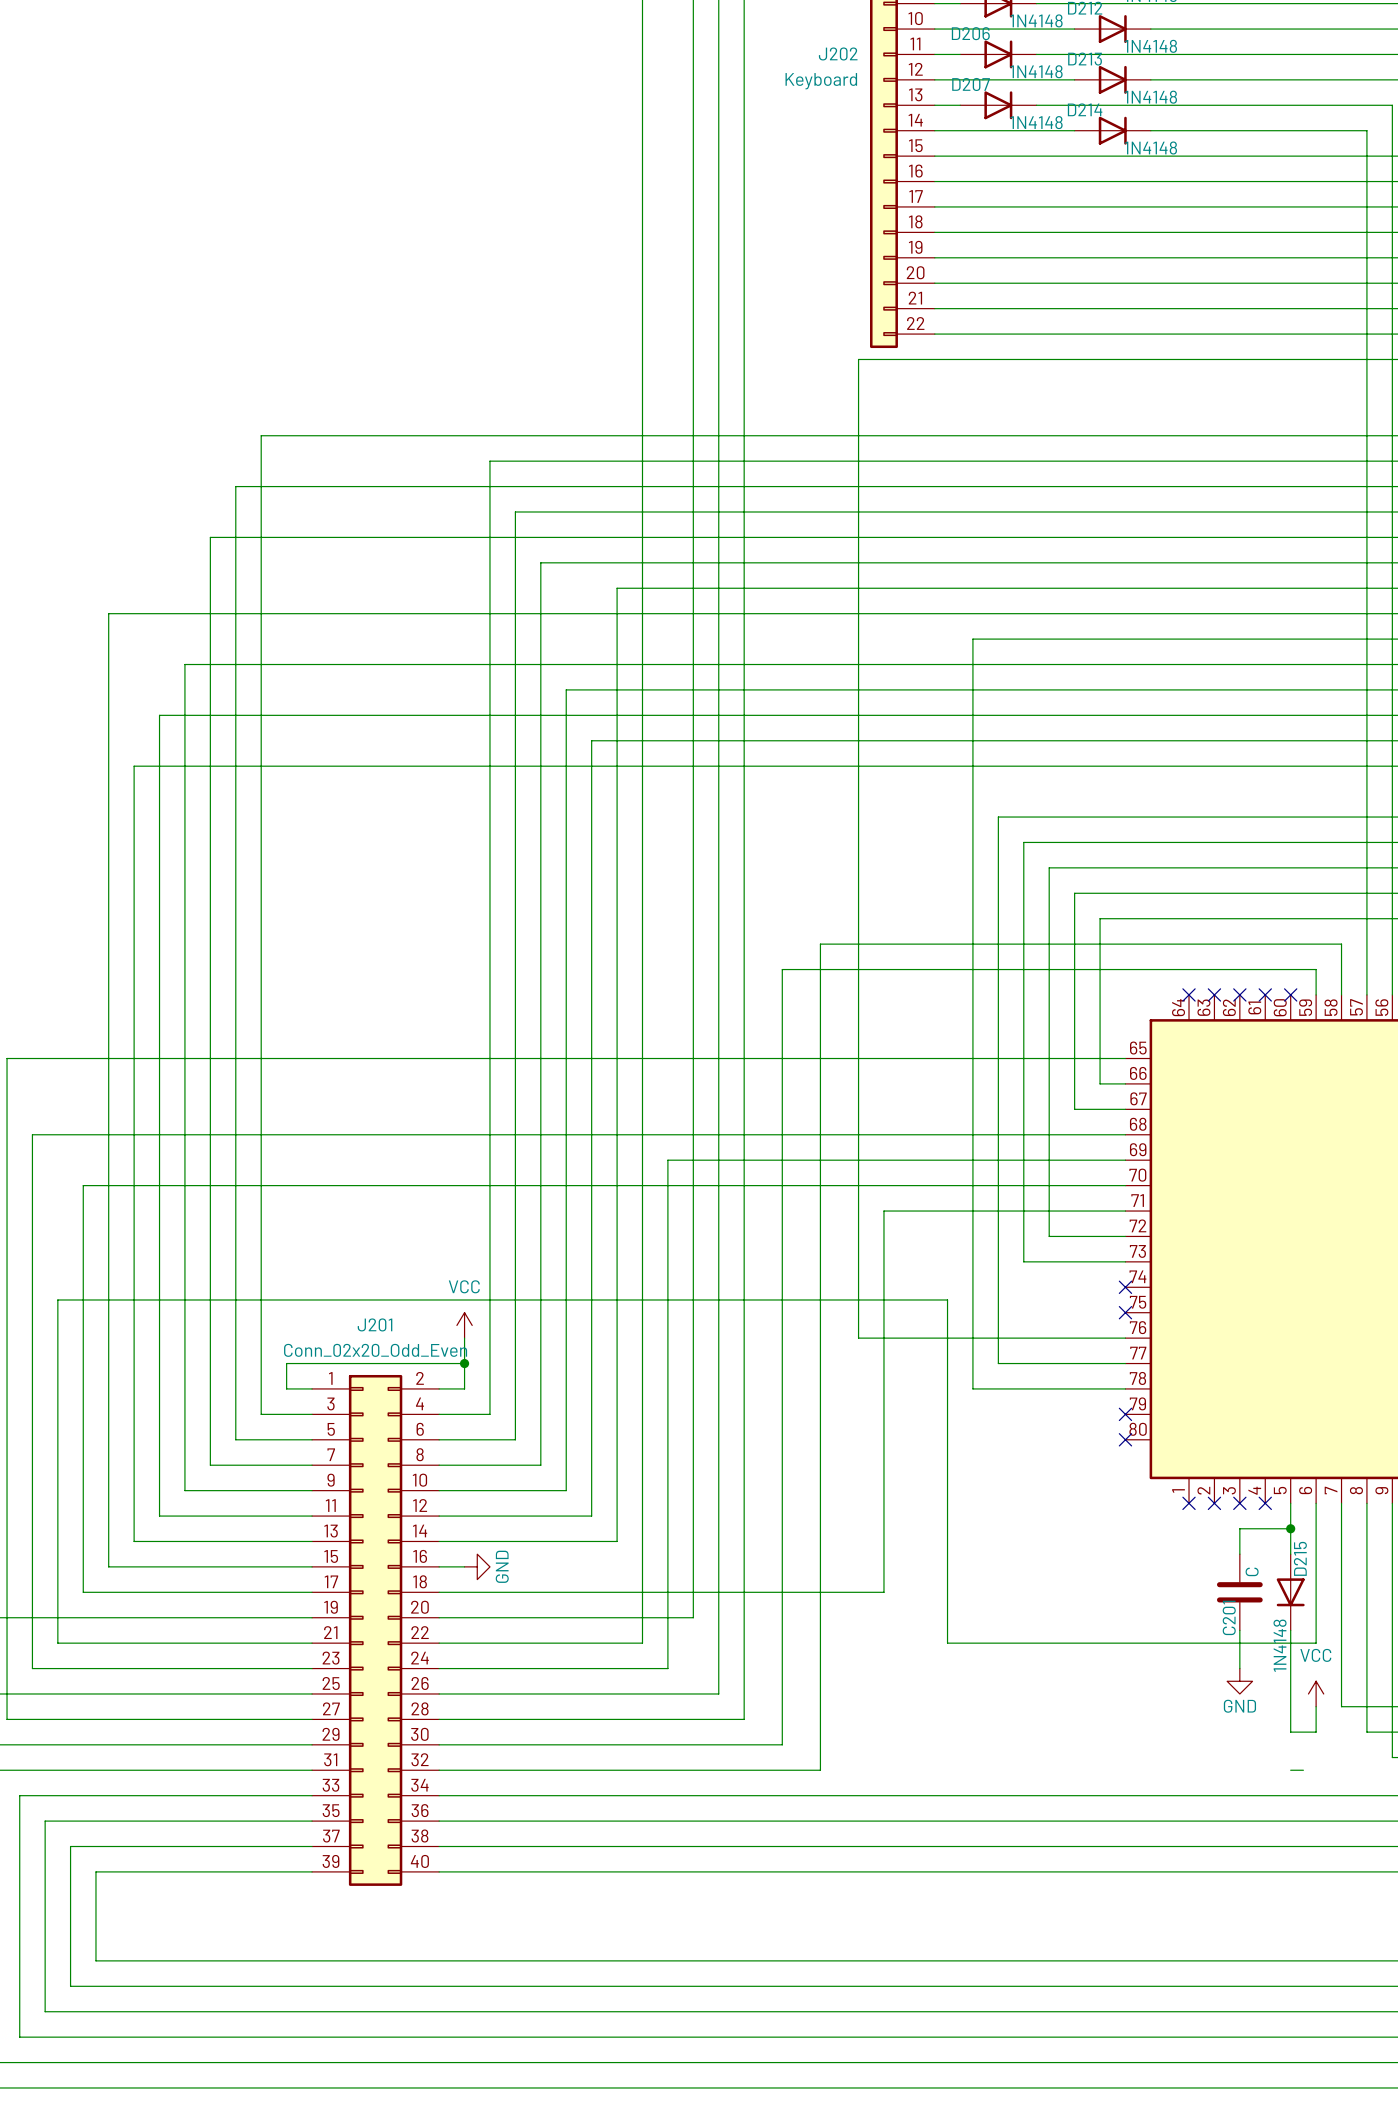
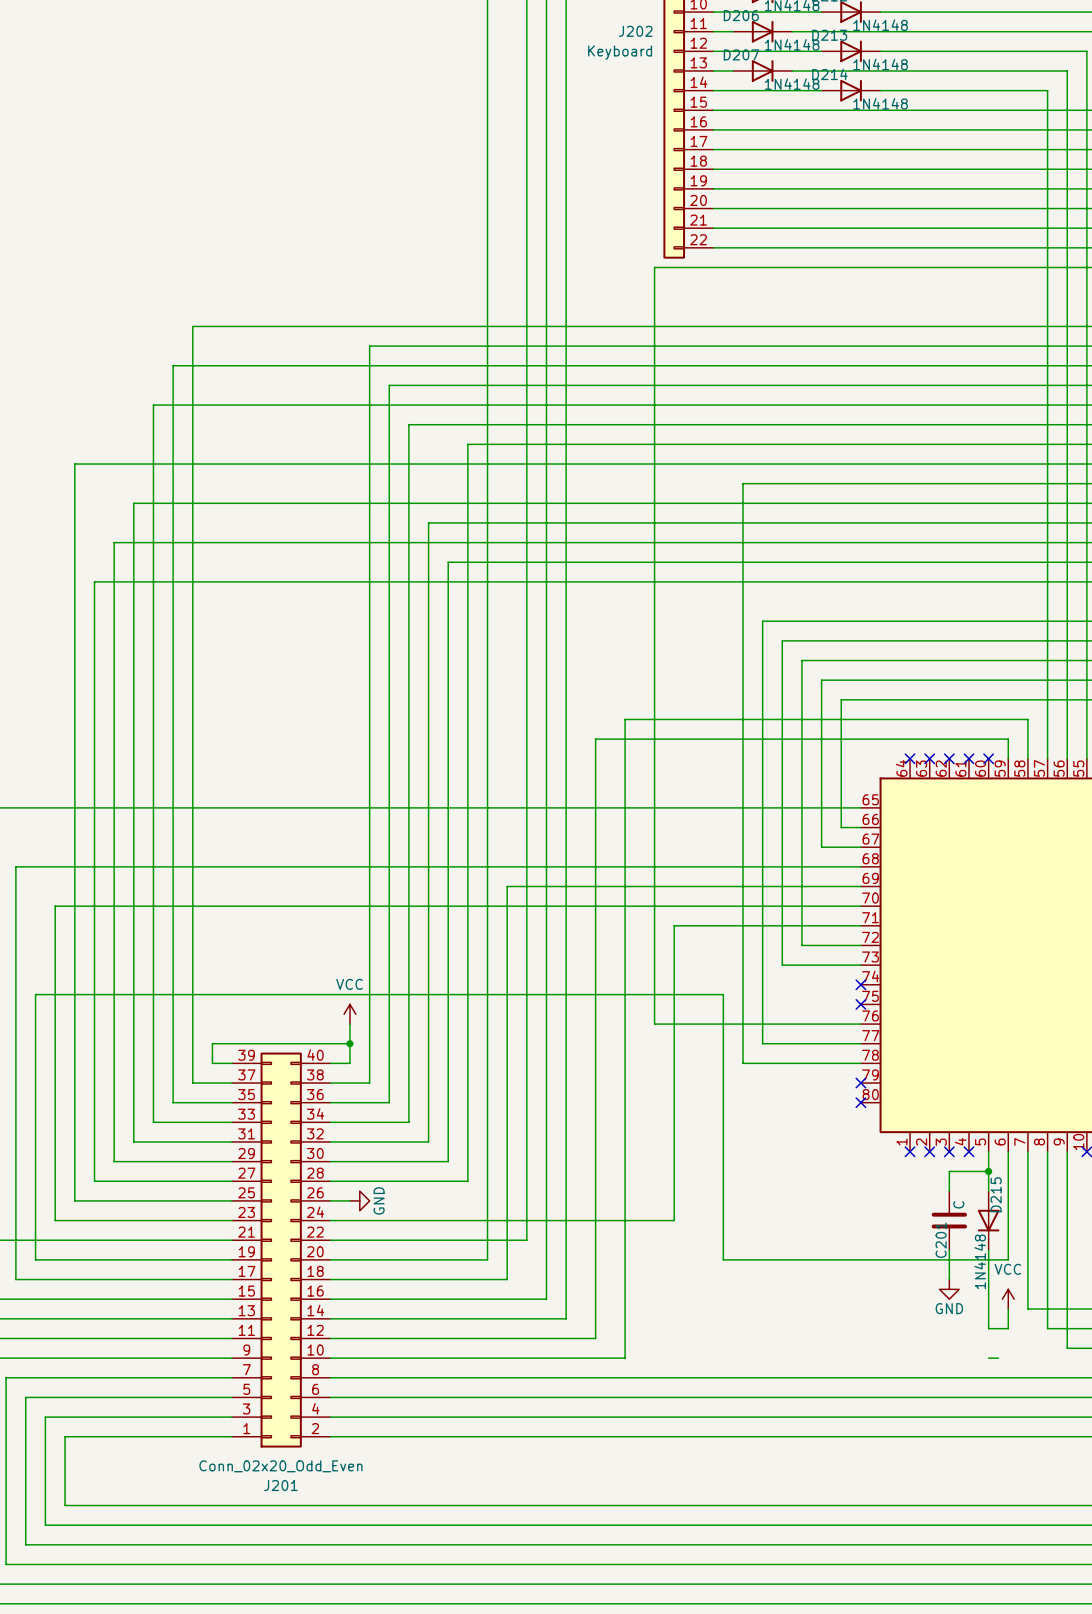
J201 flip: as is (375, 1630) -> up-down (281, 1250)

